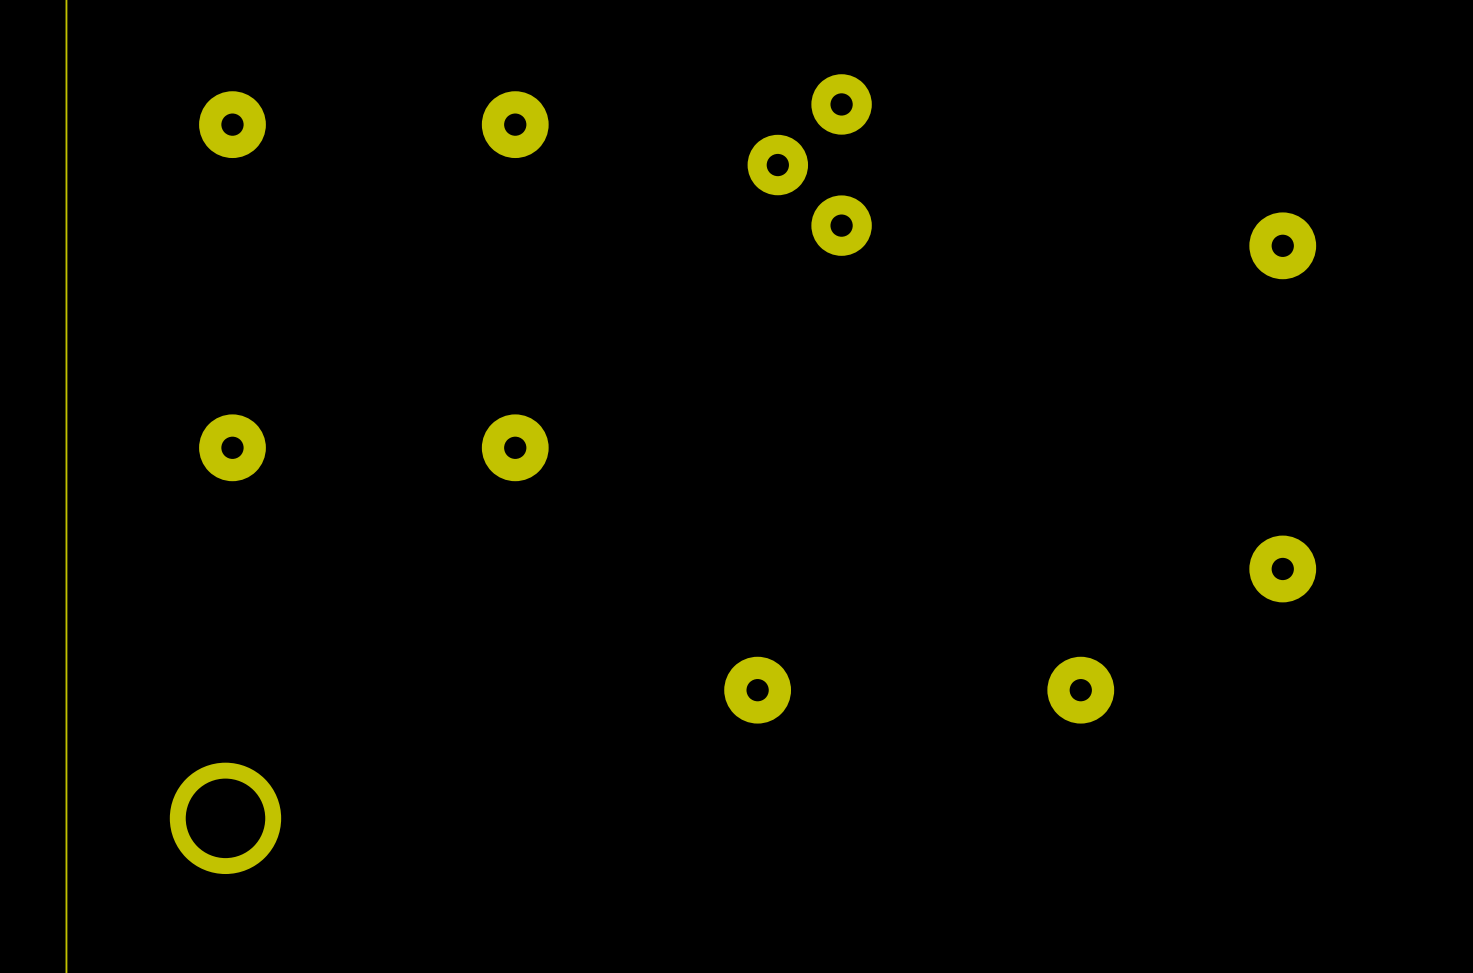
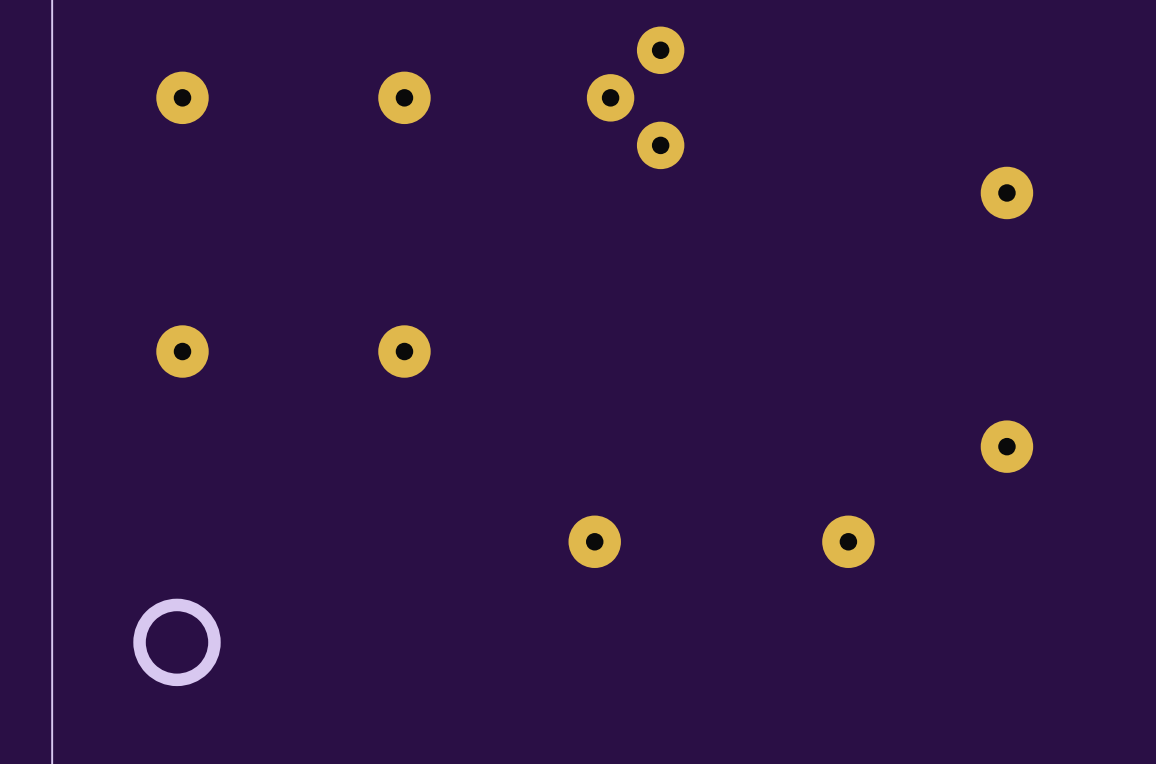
part position: (809, 165) -> (635, 97)

